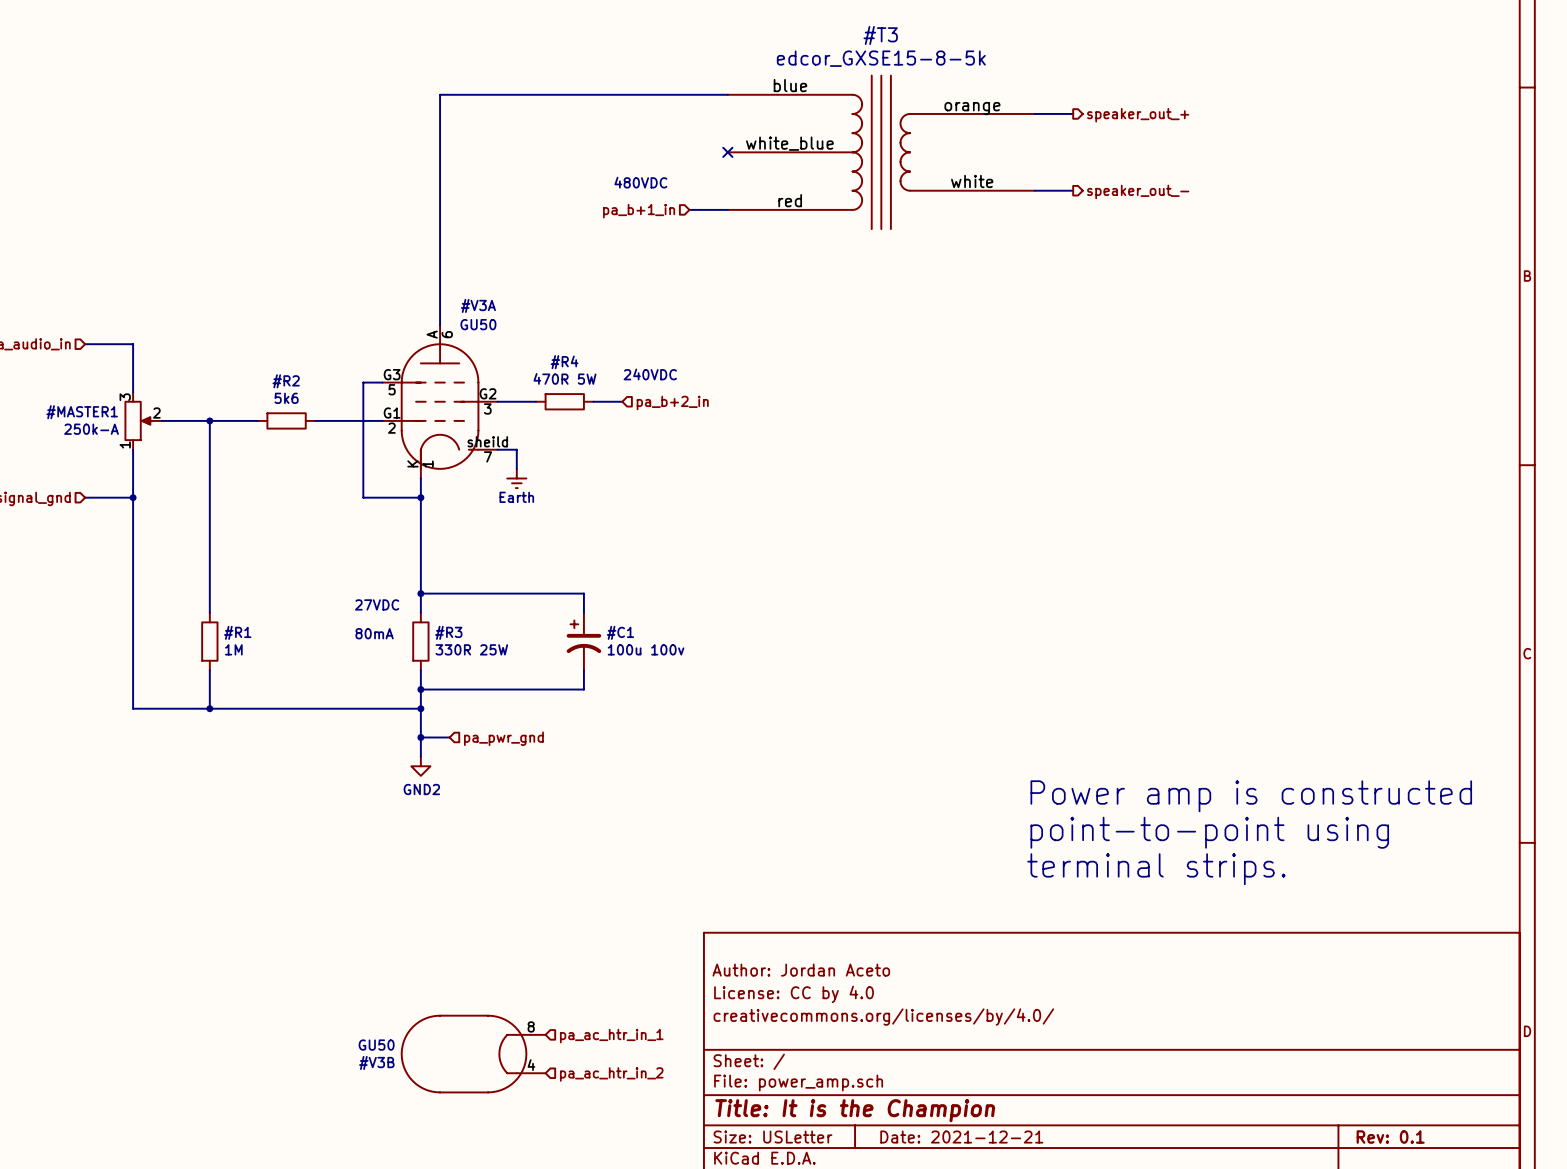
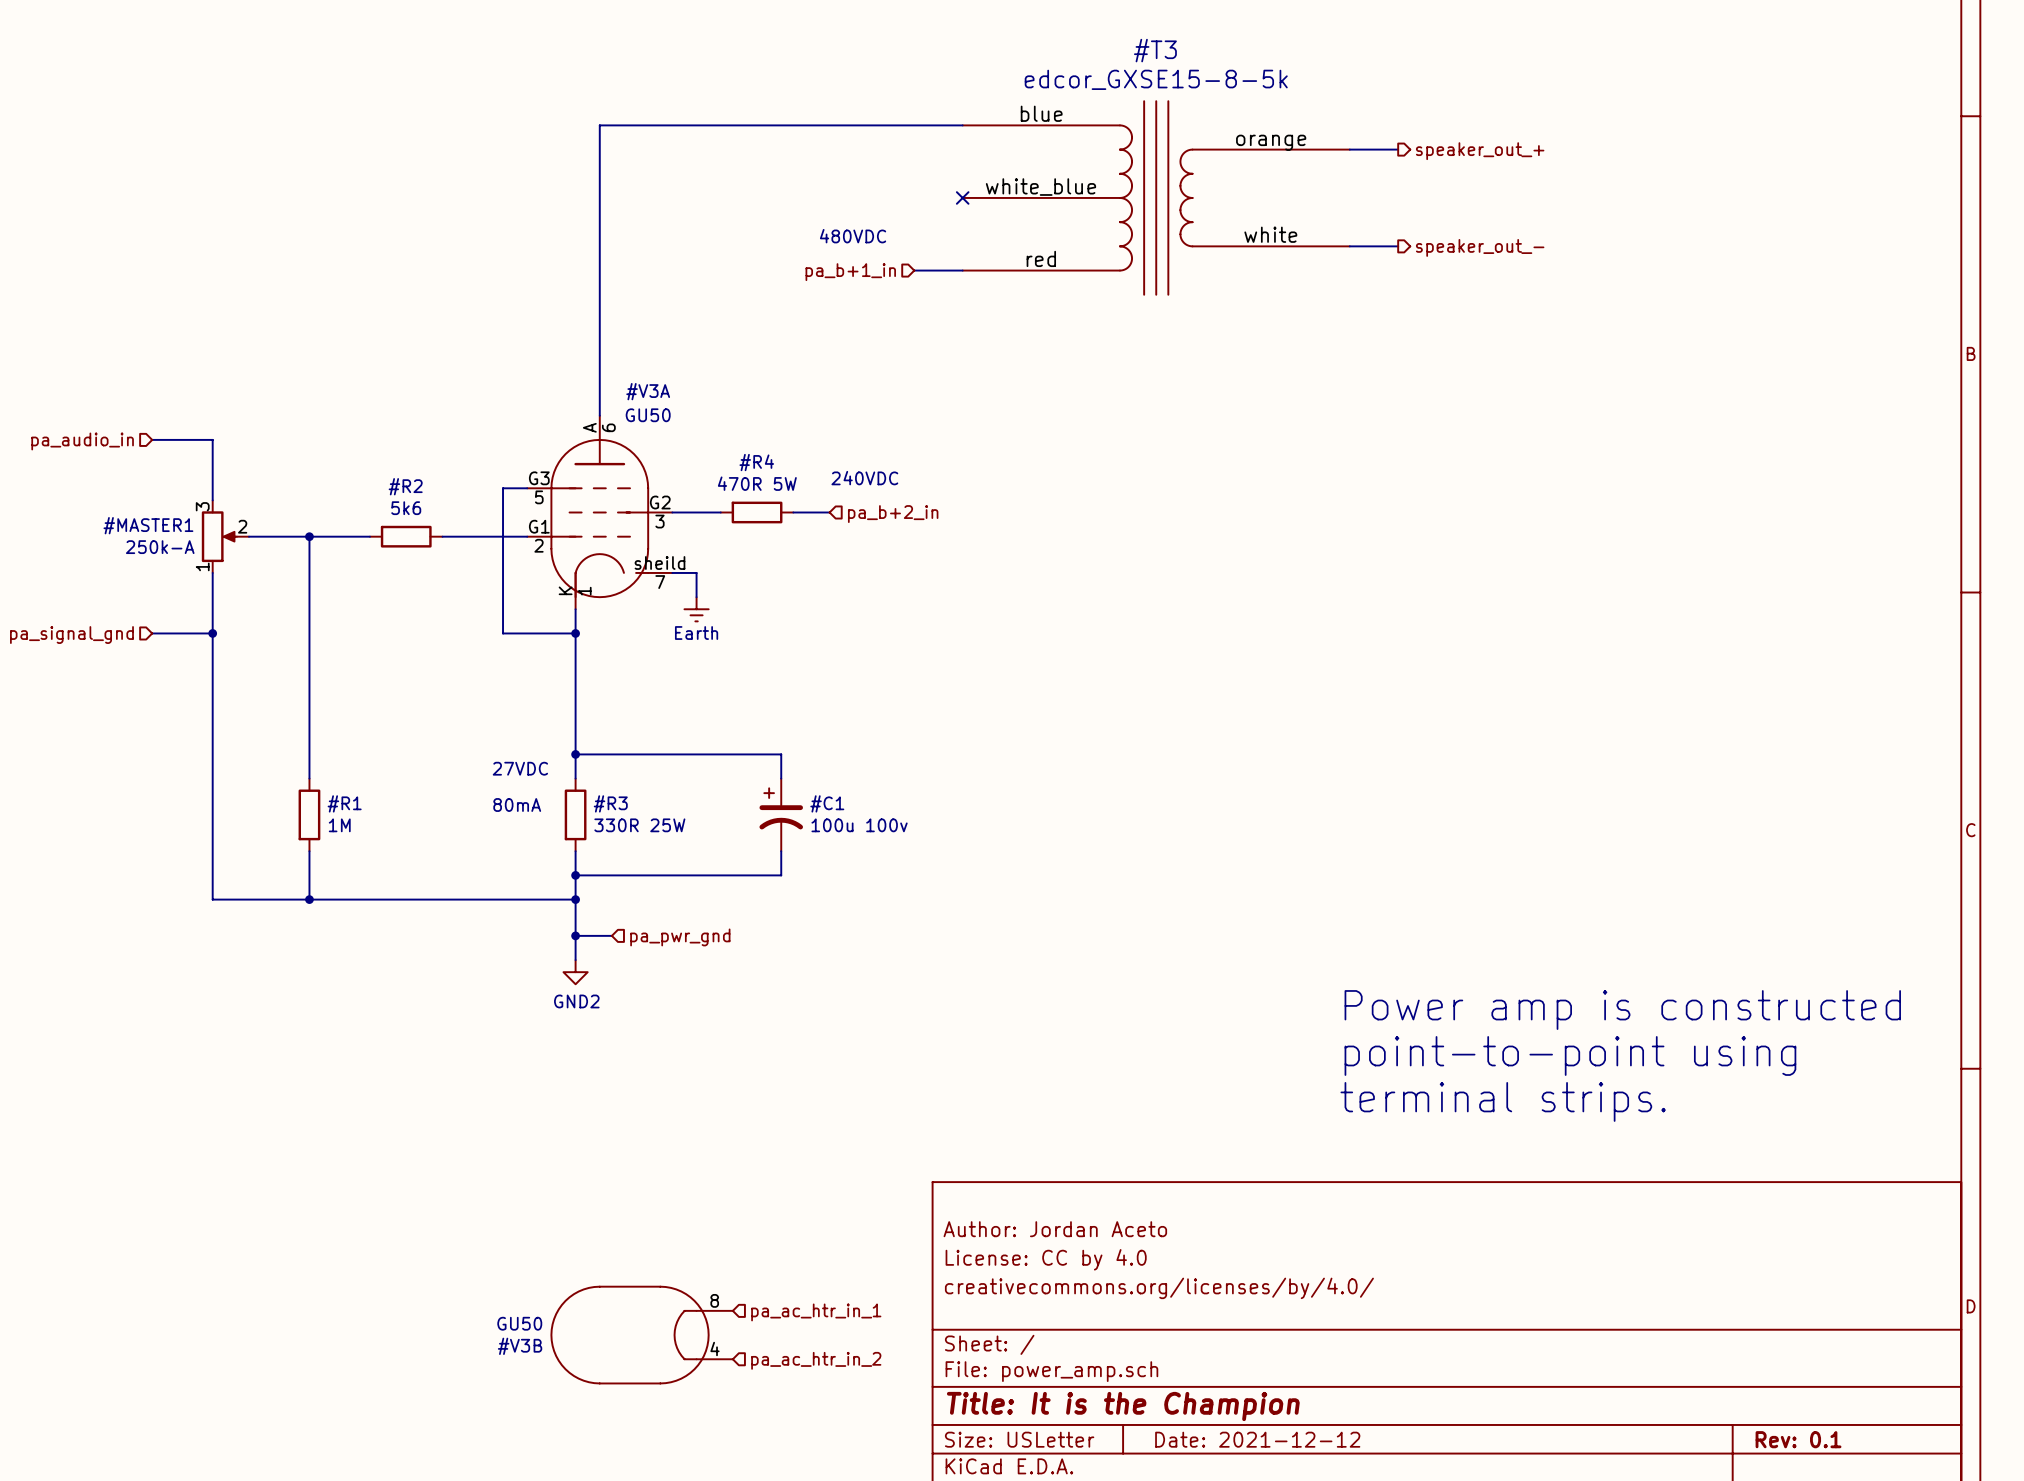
title block: Date: 2021-12-21 (961, 1137) -> Date: 2021-12-12 (1257, 1439)

